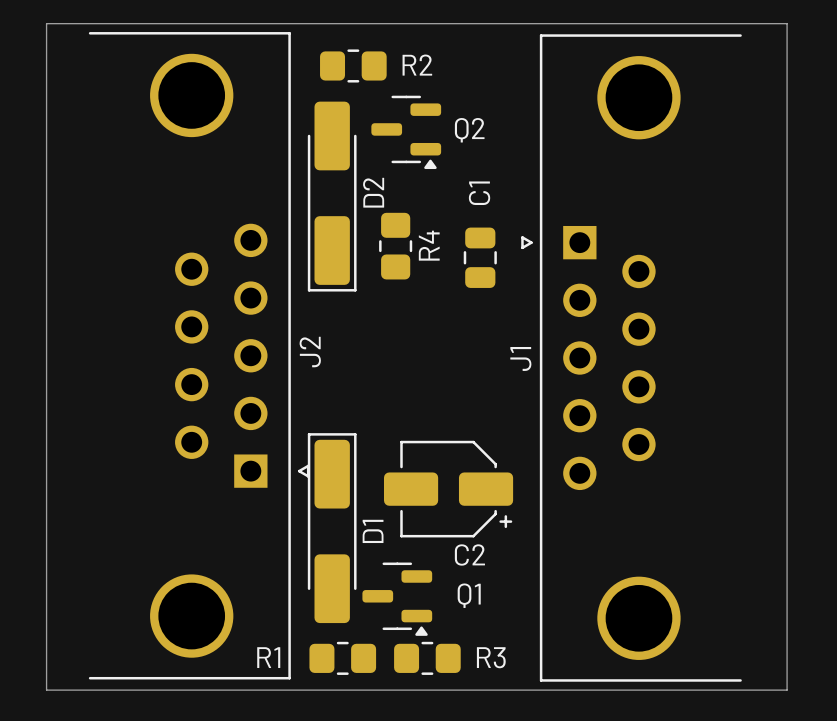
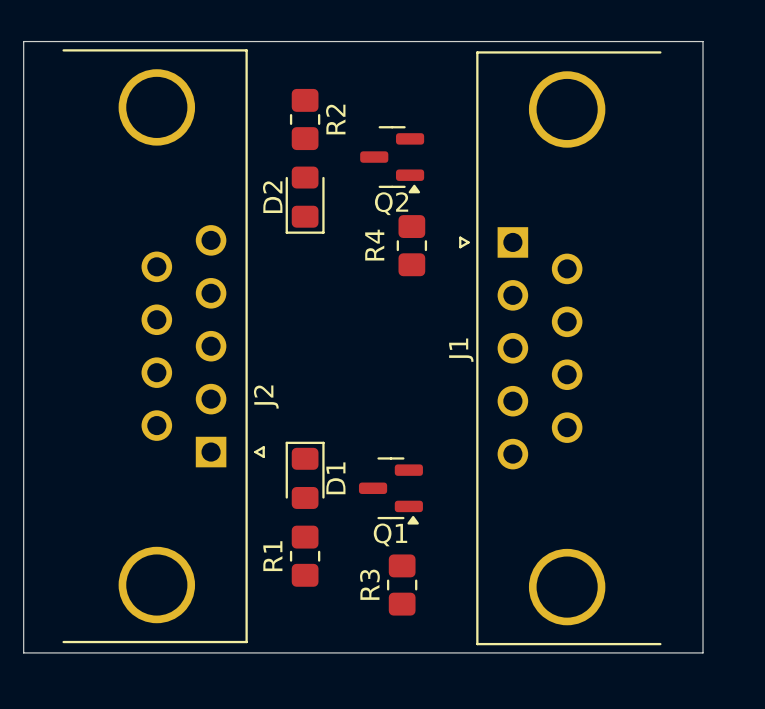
R2 rotation: 0° (353, 65) -> 90° clockwise (305, 119)
R2 position: (353, 65) -> (305, 119)
D2 footprint: [307, 101, 357, 292] -> [285, 166, 325, 234]
Q2 name position: Q2 (469, 130) -> Q2 (391, 203)
Q2 position: (406, 132) -> (392, 159)
D2 name position: D2 (373, 192) -> D2 (272, 197)
R4 position: (395, 246) -> (411, 245)
C1: (480, 257) -> none
J2 name position: J2 (310, 352) -> J2 (266, 397)
D1 footprint: [307, 433, 357, 624] -> [285, 441, 325, 509]
C2: (448, 489) -> none
Q1 name position: Q1 (469, 595) -> Q1 (390, 534)
Q1 position: (397, 599) -> (390, 490)
R3 name position: R3 (491, 657) -> R3 (369, 584)
R1 rotation: 0° (342, 658) -> 90° clockwise (305, 556)
R1 position: (342, 658) -> (305, 556)
R3 rotation: 0° (427, 658) -> 90° clockwise (402, 585)
R3 position: (427, 658) -> (402, 585)

